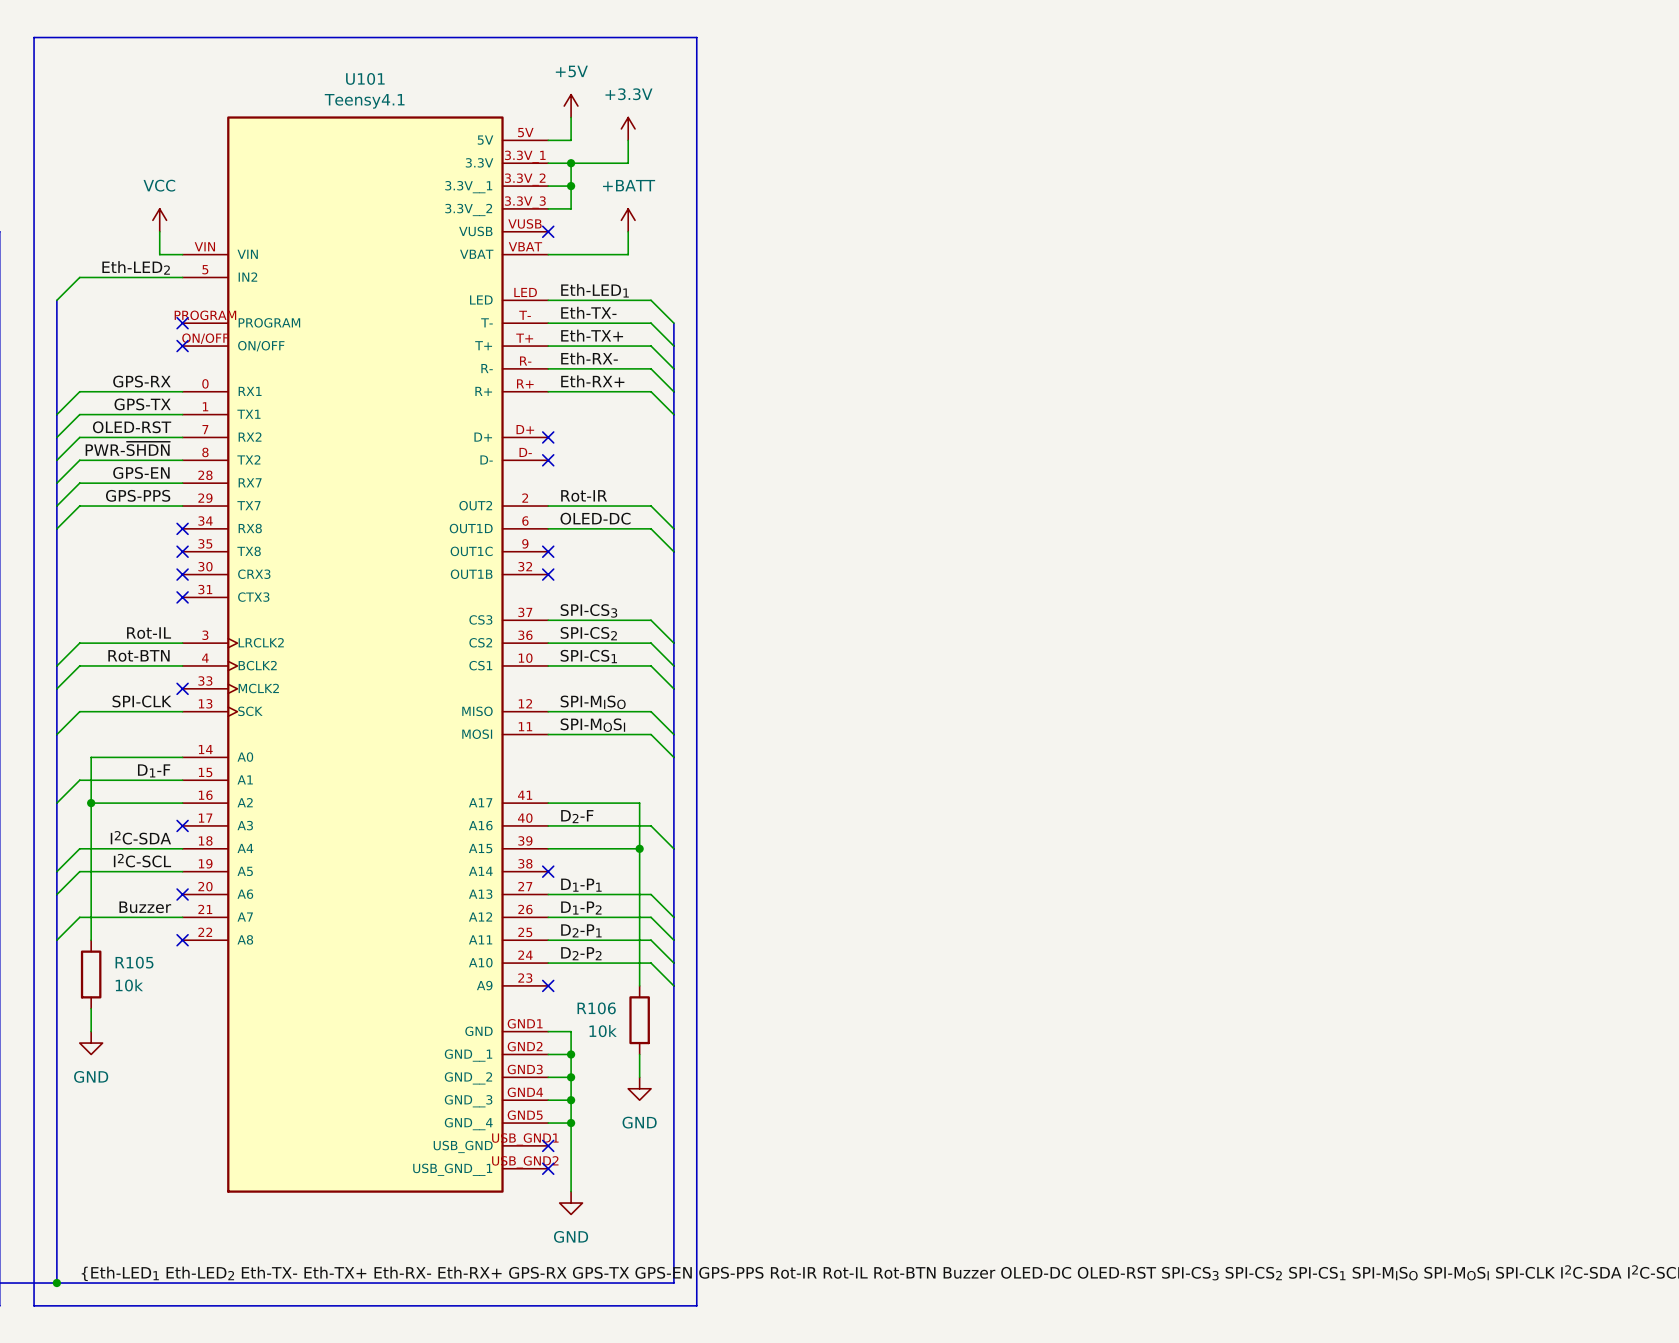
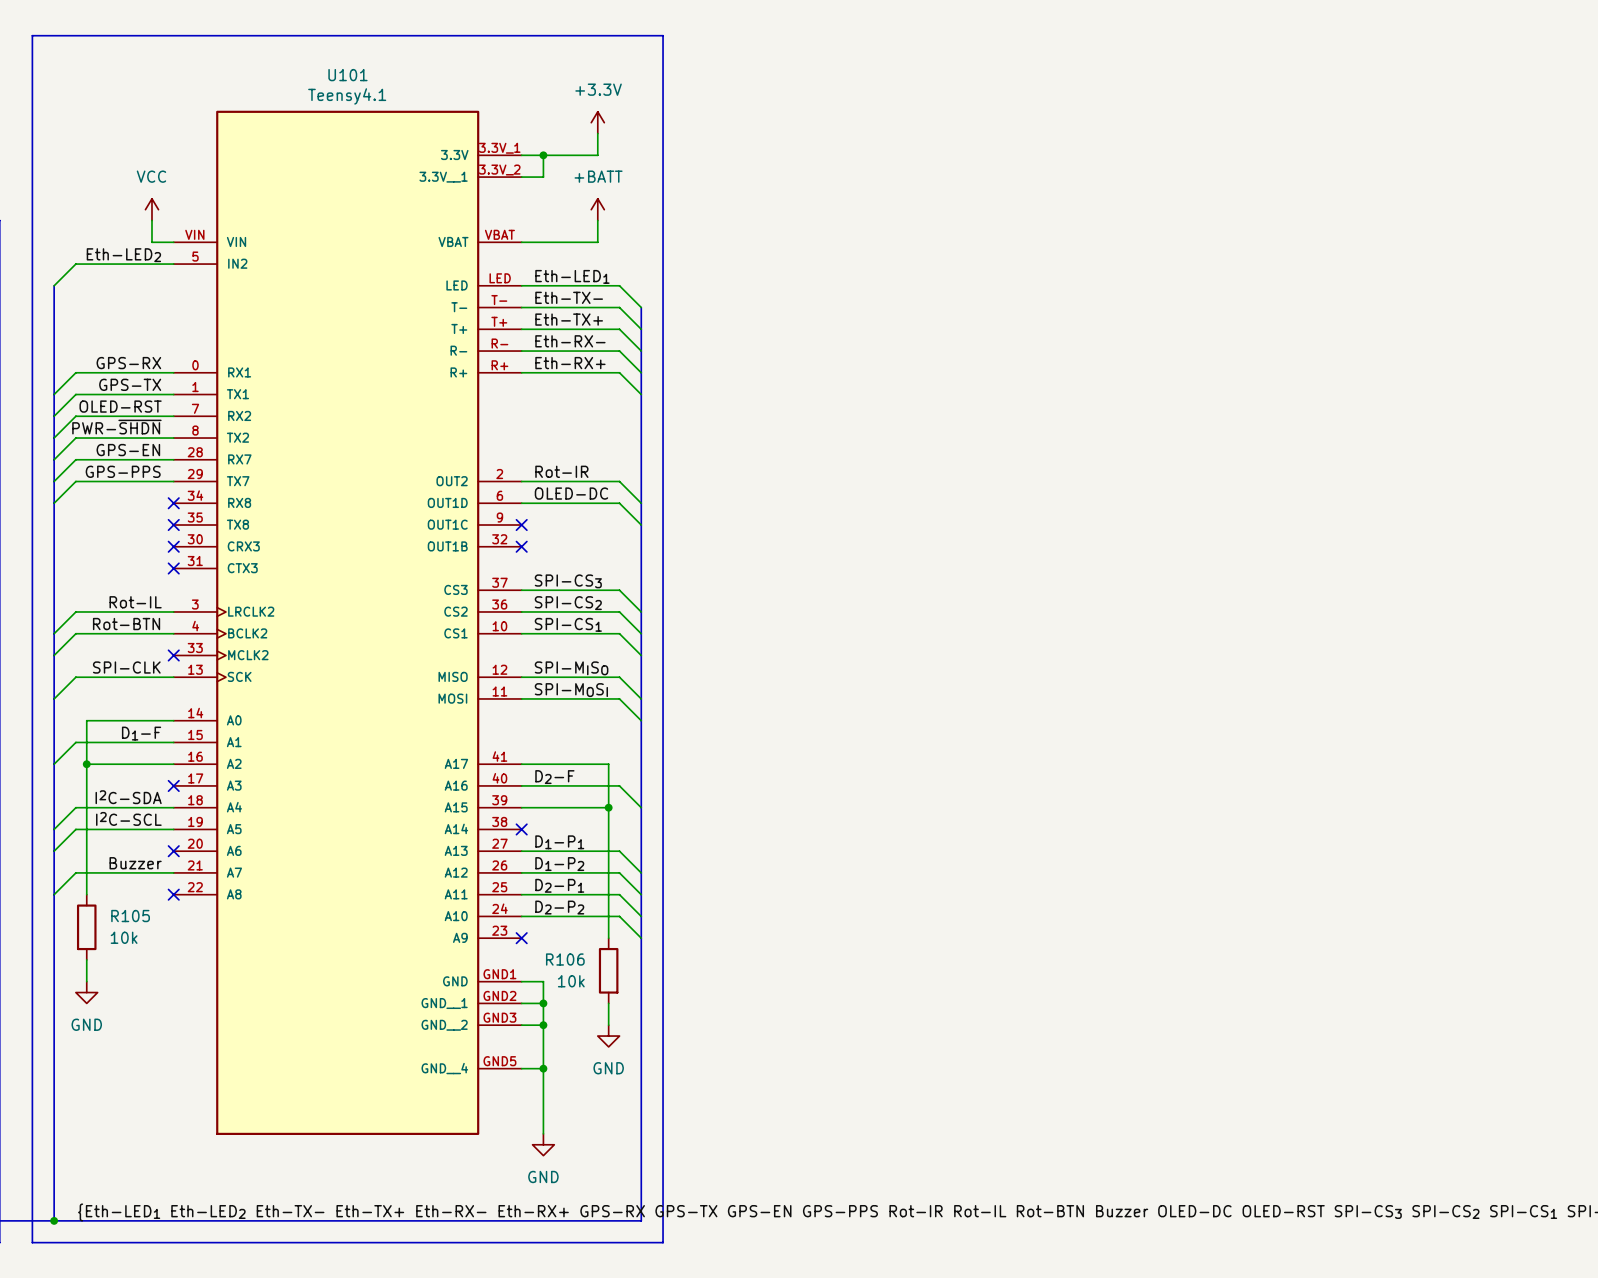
power symbol: +5V (571, 106) -> none
U101 symbol: [182, 116, 549, 1193] -> [173, 110, 522, 1135]
wire: (571, 117) (571, 140) (548, 140) -> none
wire: (571, 186) (571, 208) (548, 208) -> none
junction: (571, 186) -> none
no-connect mark: (548, 231) -> none
no-connect mark: (182, 323) -> none
no-connect mark: (182, 346) -> none
no-connect mark: (548, 437) -> none
no-connect mark: (548, 460) -> none
wire: (548, 1100) (571, 1100) -> none
junction: (571, 1100) -> none
no-connect mark: (548, 1145) -> none
no-connect mark: (548, 1168) -> none

